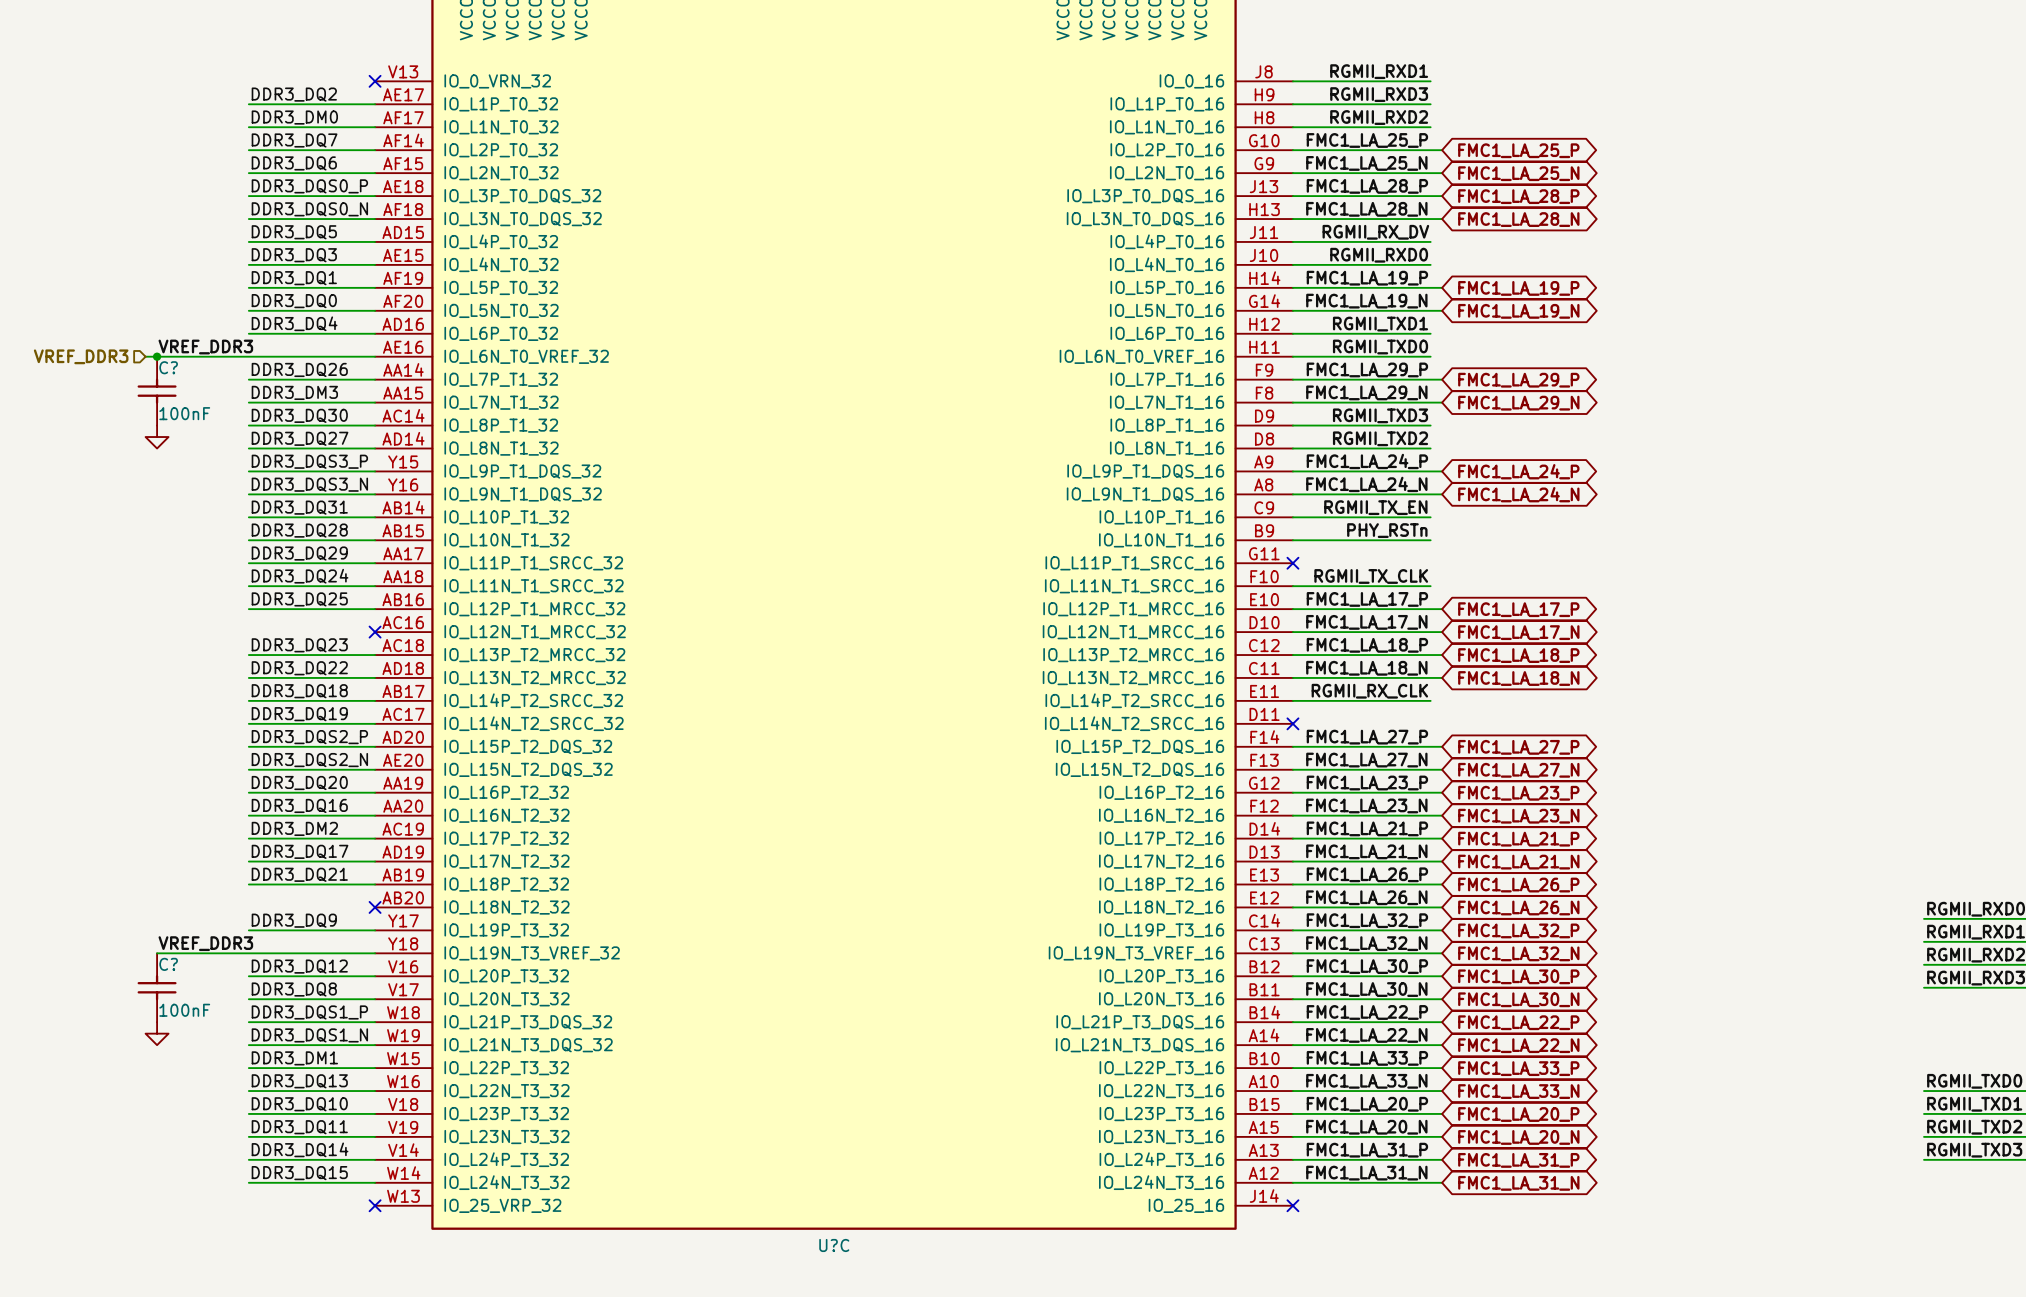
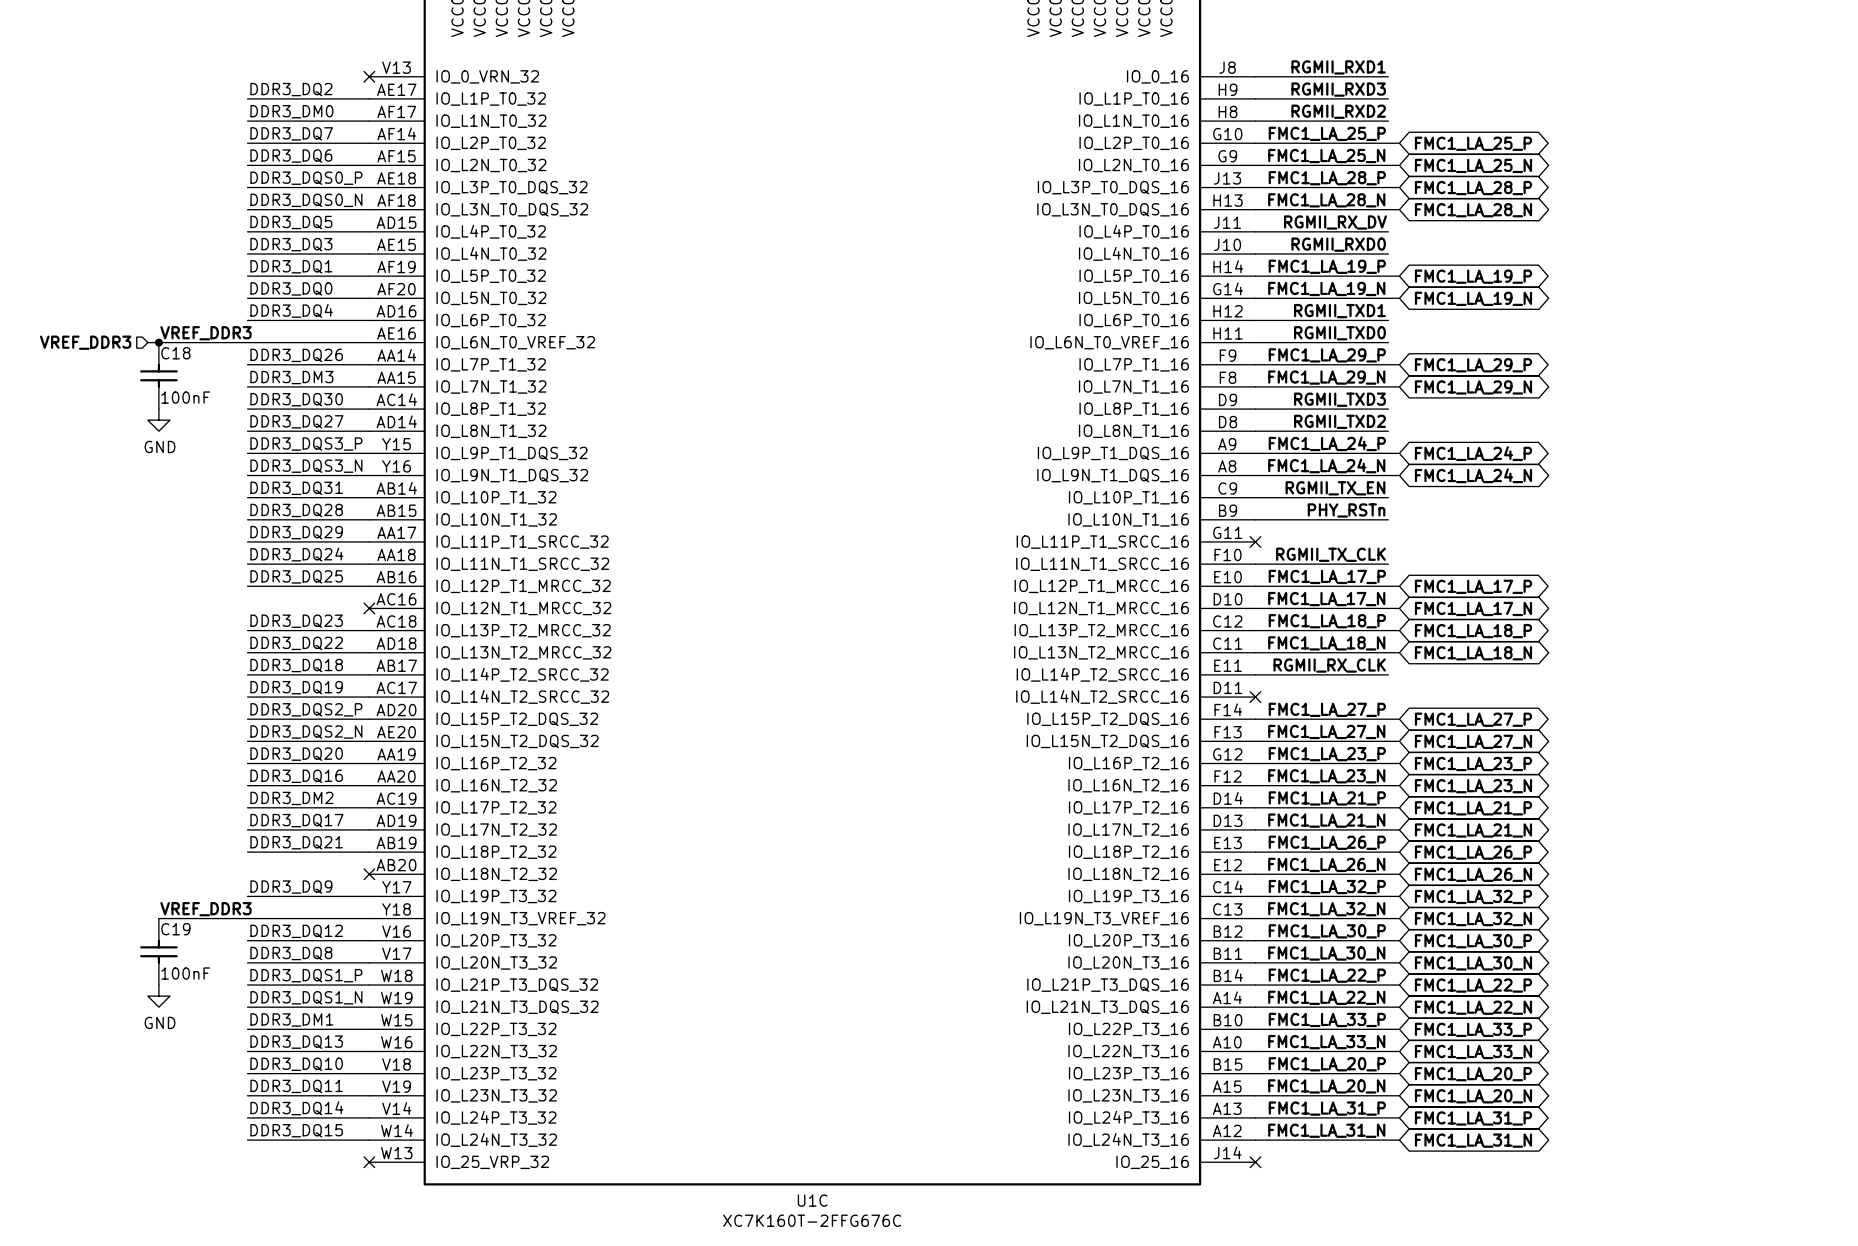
C? name: C? (168, 367) -> C18 (175, 353)
power symbol text: none -> GND (160, 446)
C? name: C? (168, 964) -> C19 (175, 929)
power symbol text: none -> GND (160, 1022)
U?C name: U?C (834, 1245) -> U1C (812, 1200)
U?C value: none -> XC7K160T-2FFG676C (812, 1220)

